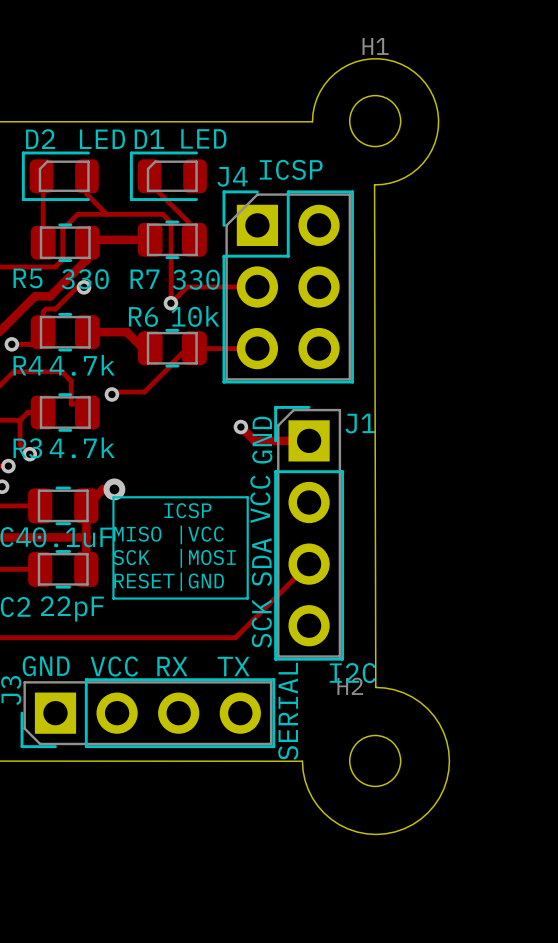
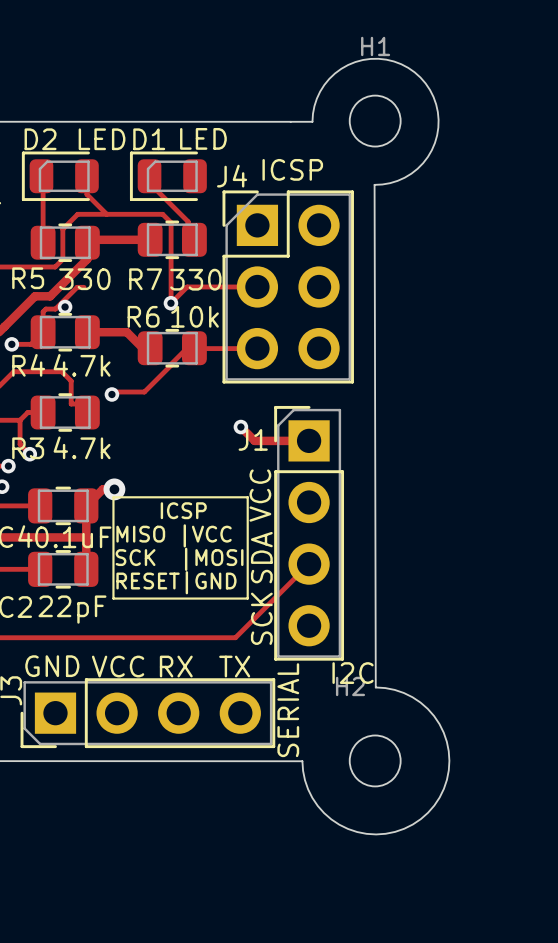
via position: (83, 287) -> (65, 306)
J1 name position: J1 (360, 423) -> J1 (253, 439)
text: GND (262, 440) -> none

